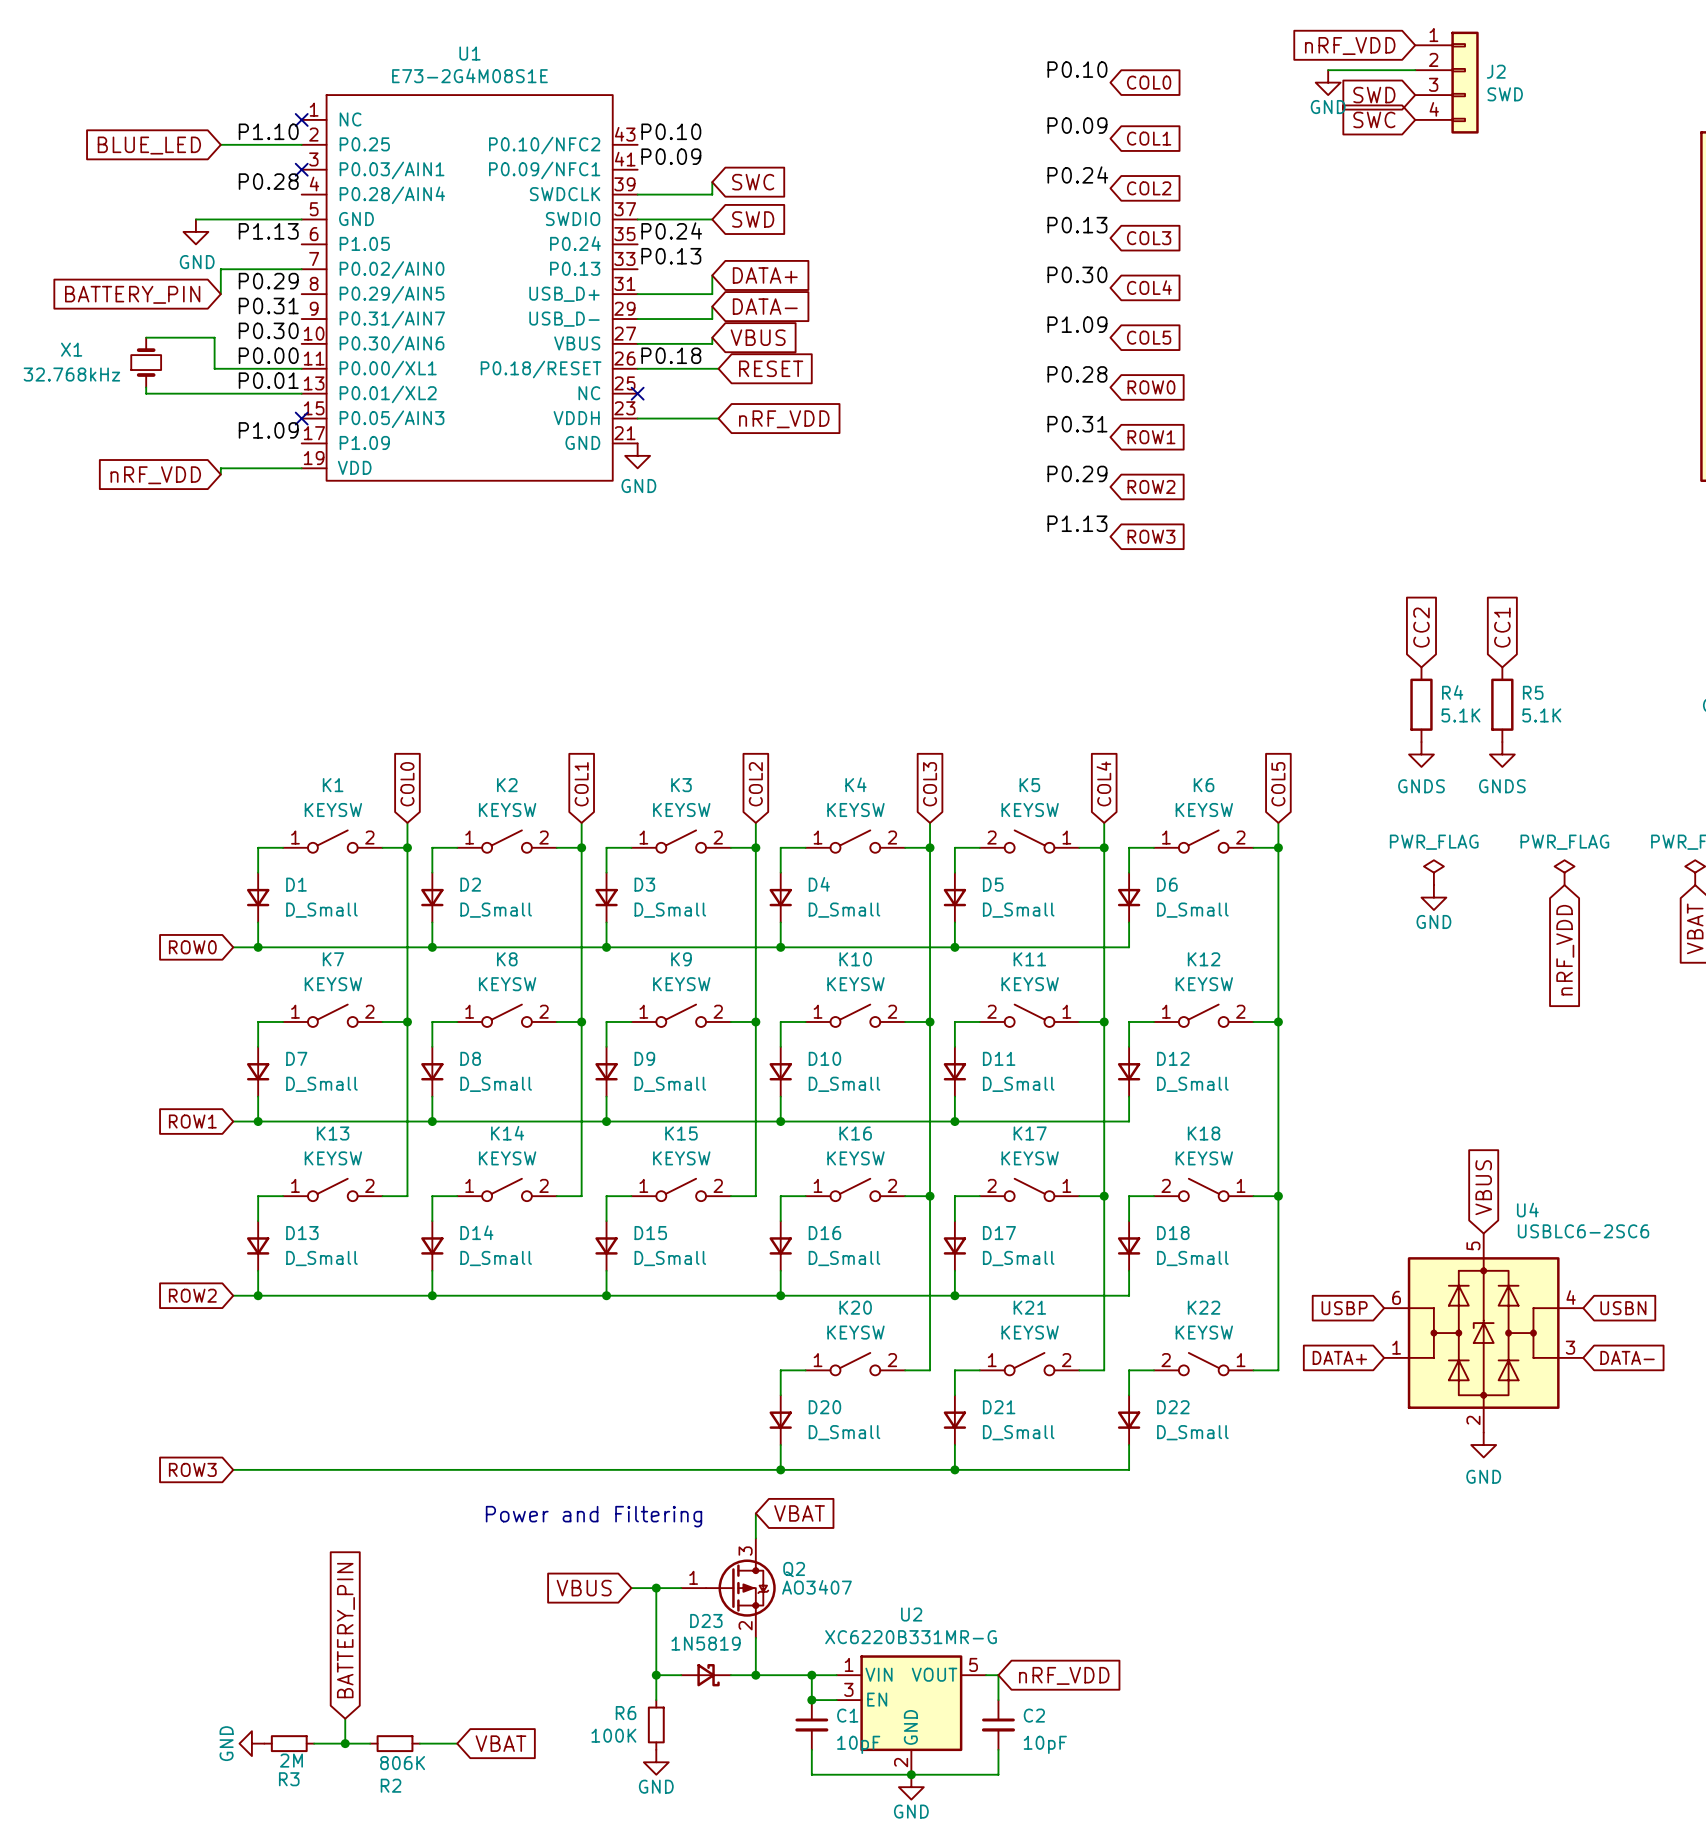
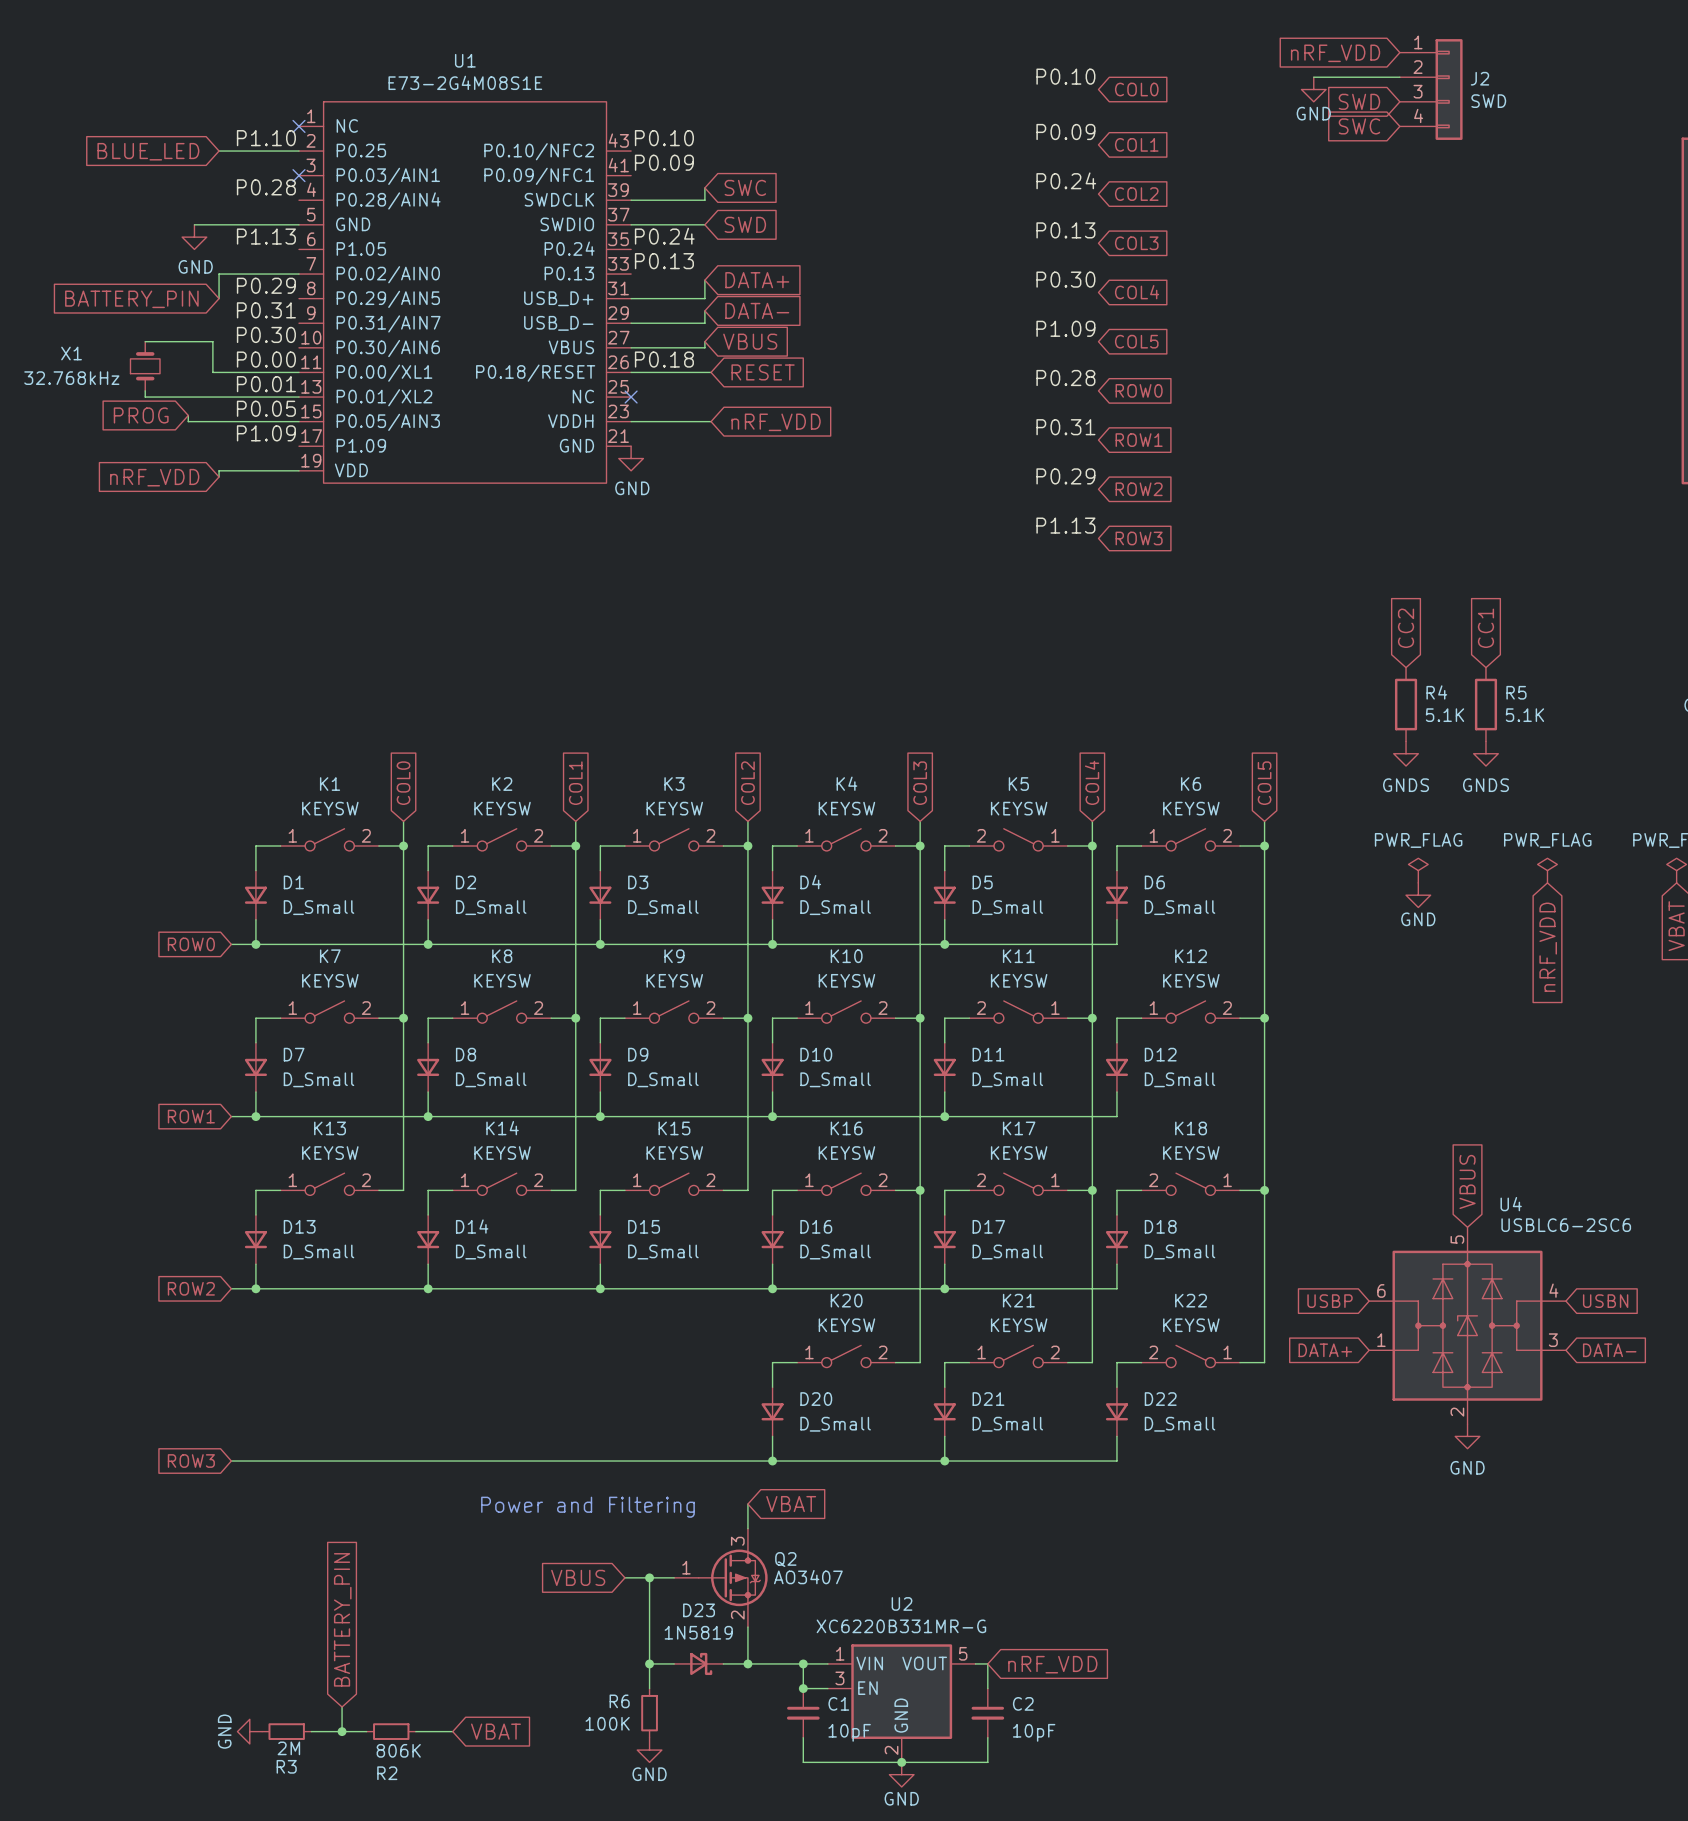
label: none -> P0.05 (266, 408)
global label: none -> PROG (141, 415)
wire: none -> (188, 415) (188, 421) (298, 421)
no-connect mark: (301, 418) -> none

